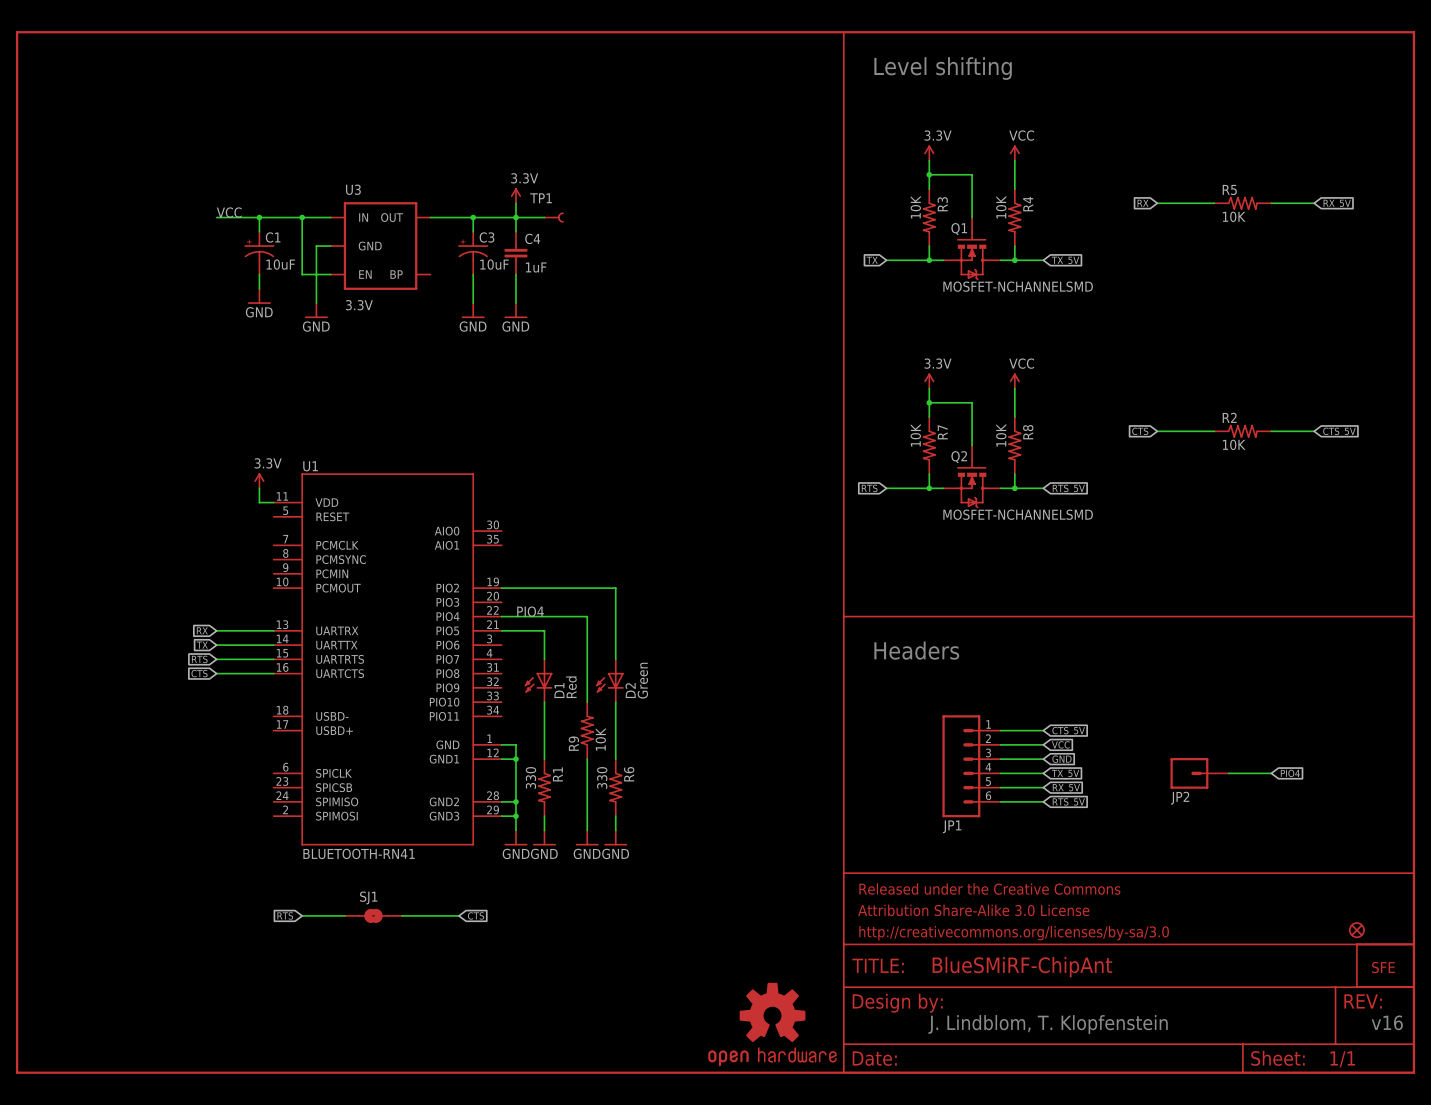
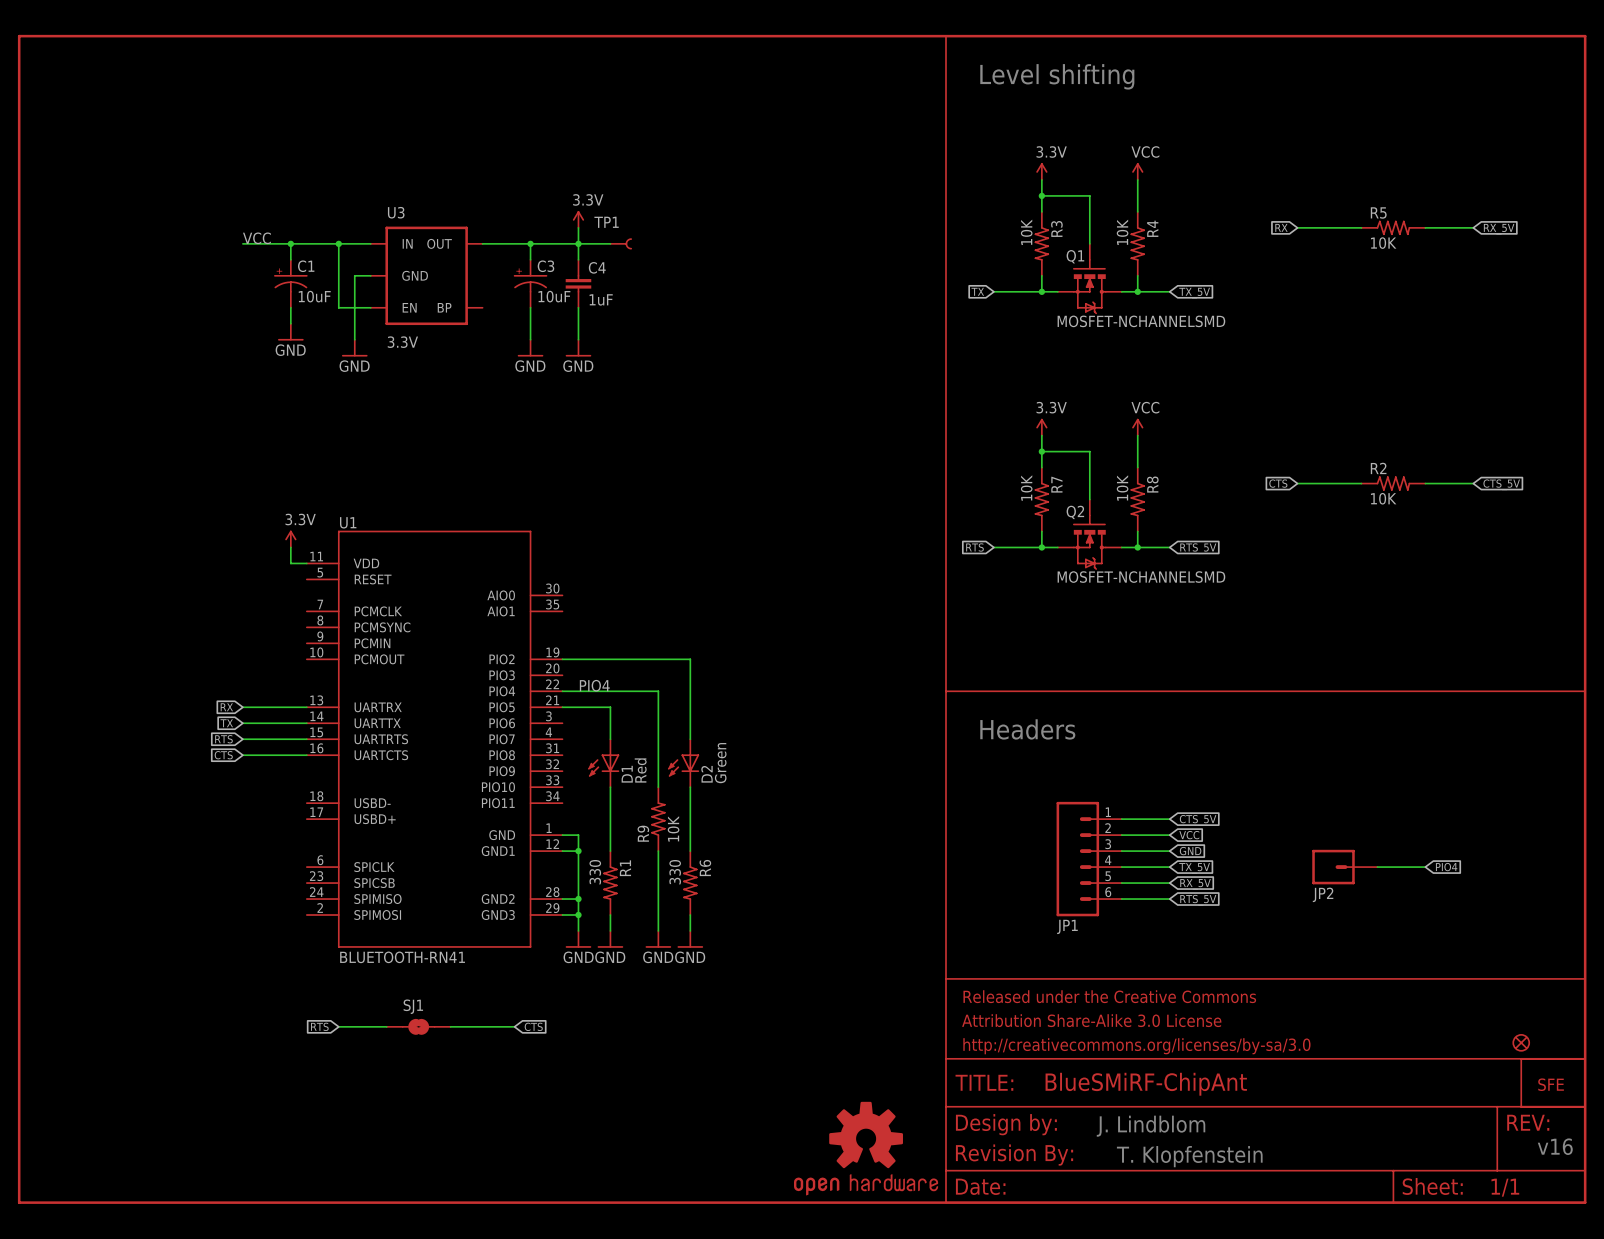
text: none -> J. Lindblom (1151, 1126)
text: J. Lindblom, T. Klopfenstein (1048, 1024) -> T. Klopfenstein (1189, 1156)
part: none -> (1014, 1155)

